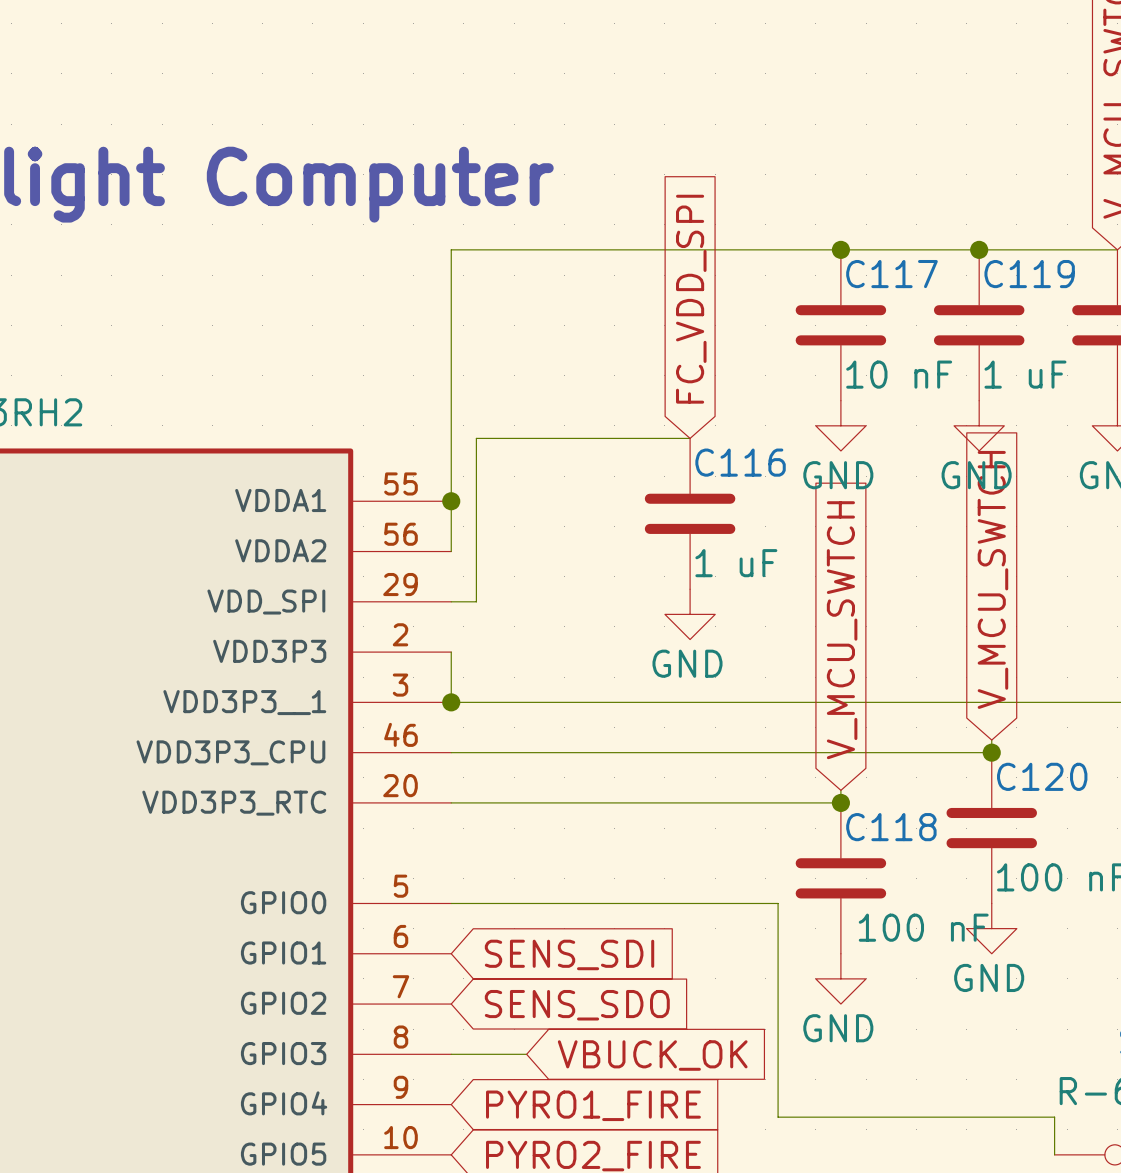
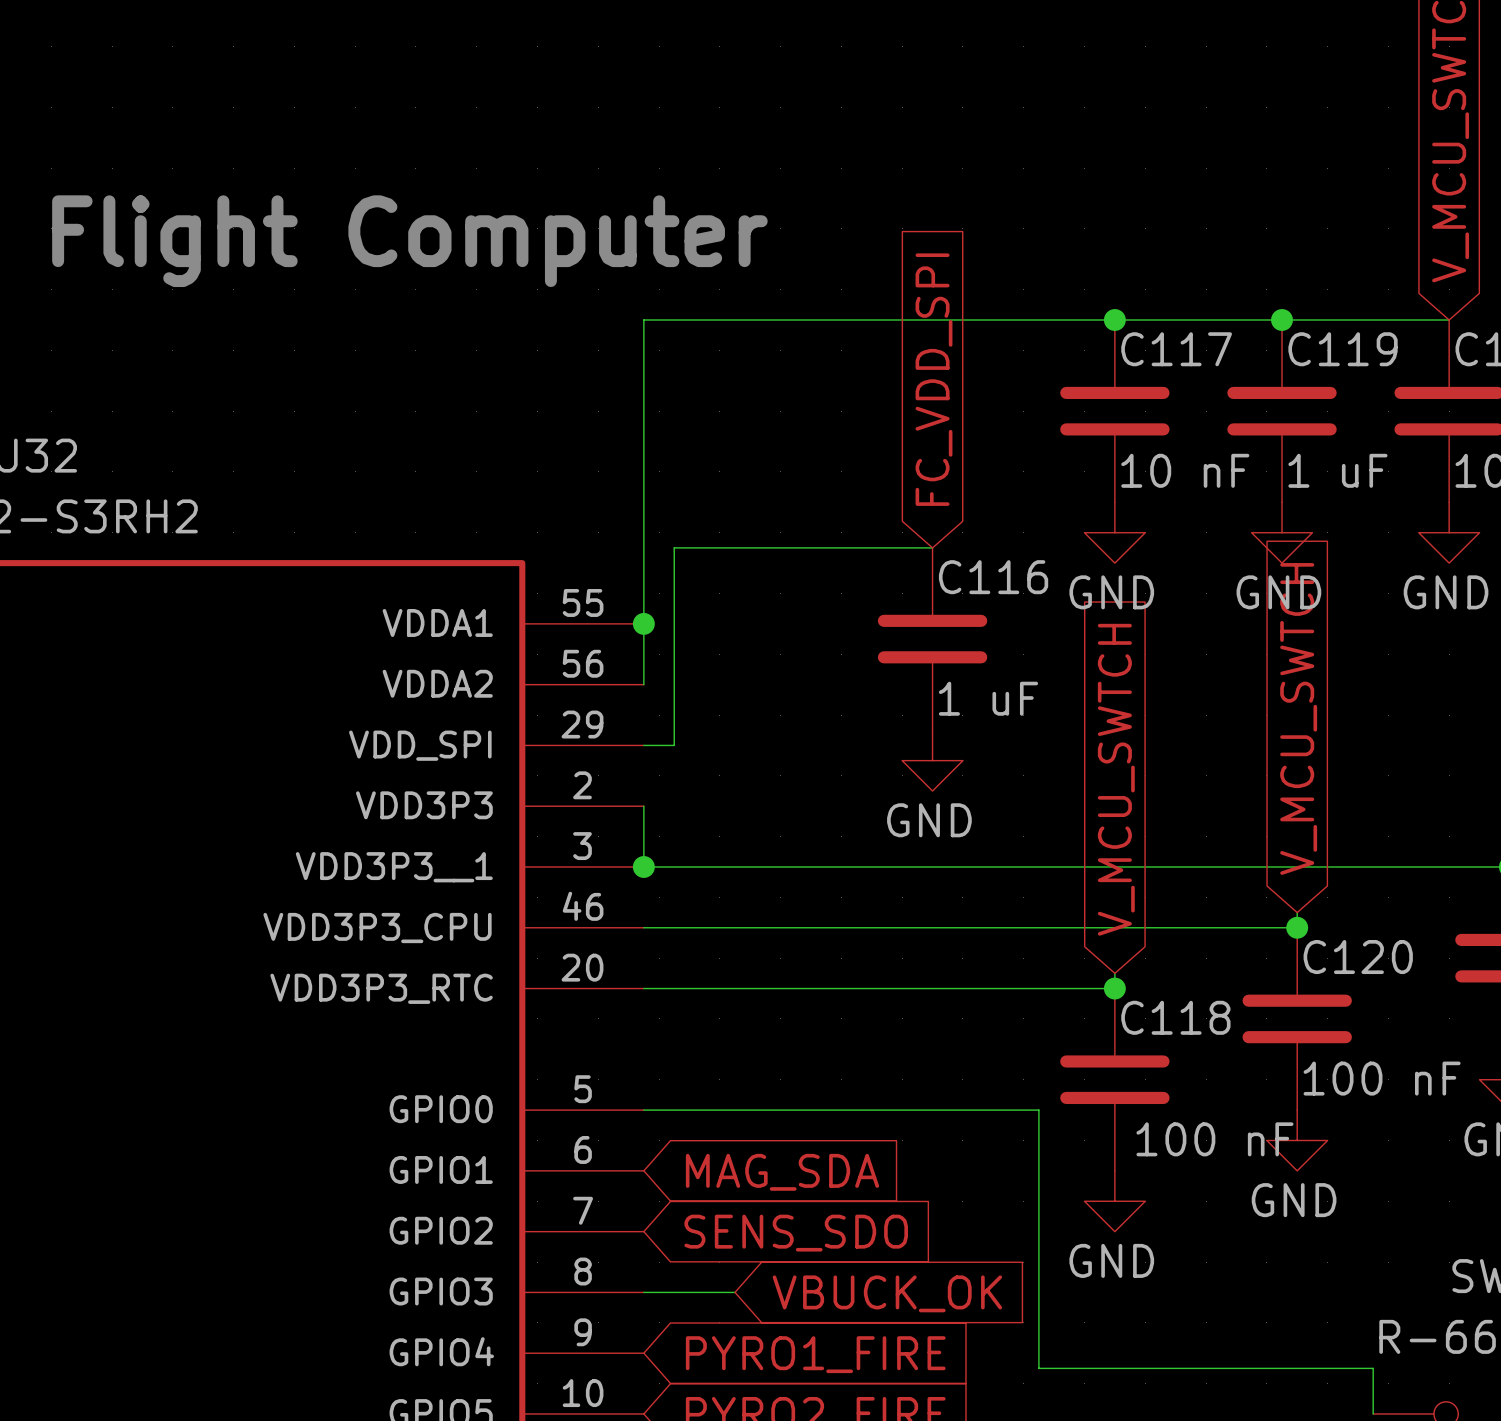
global label: SENS_SDI (569, 954) -> MAG_SDA (782, 1172)

